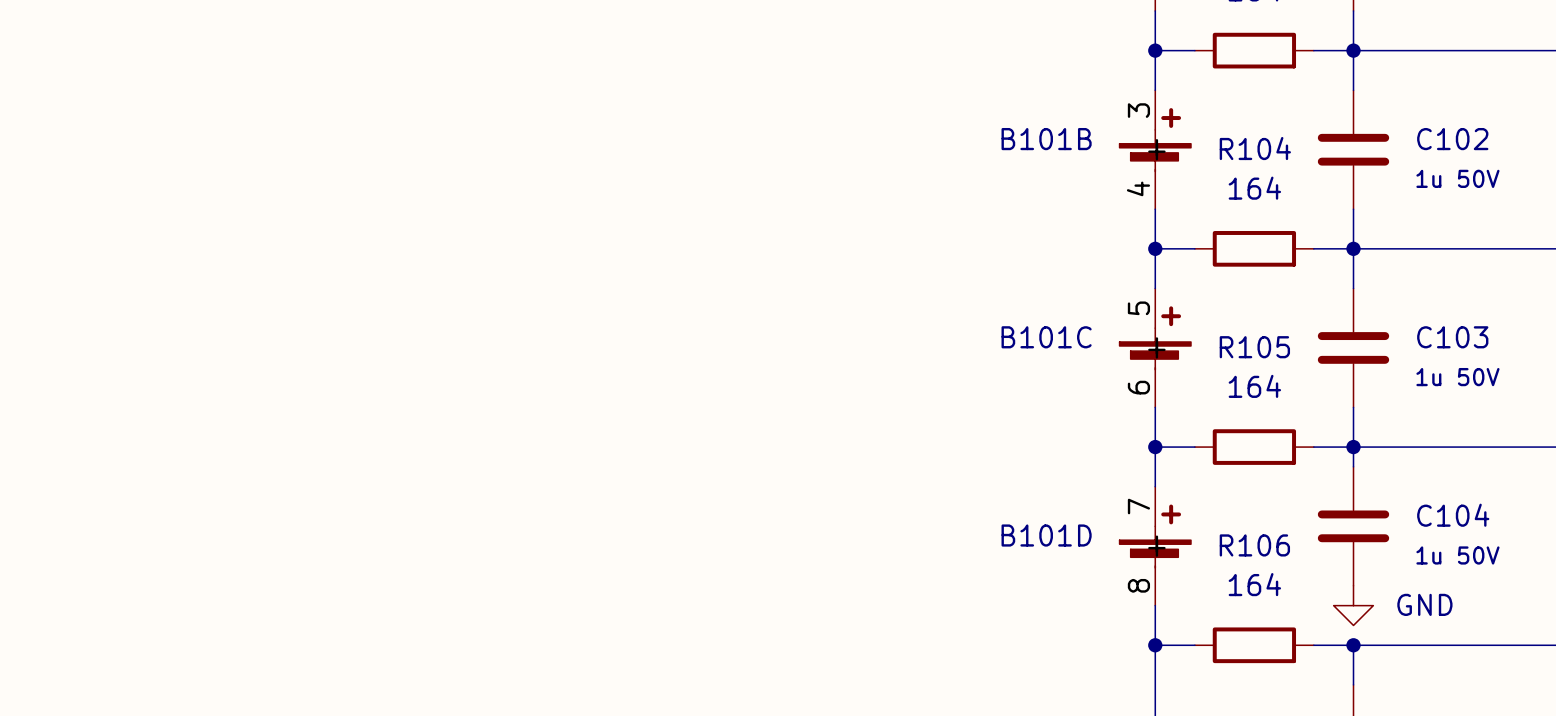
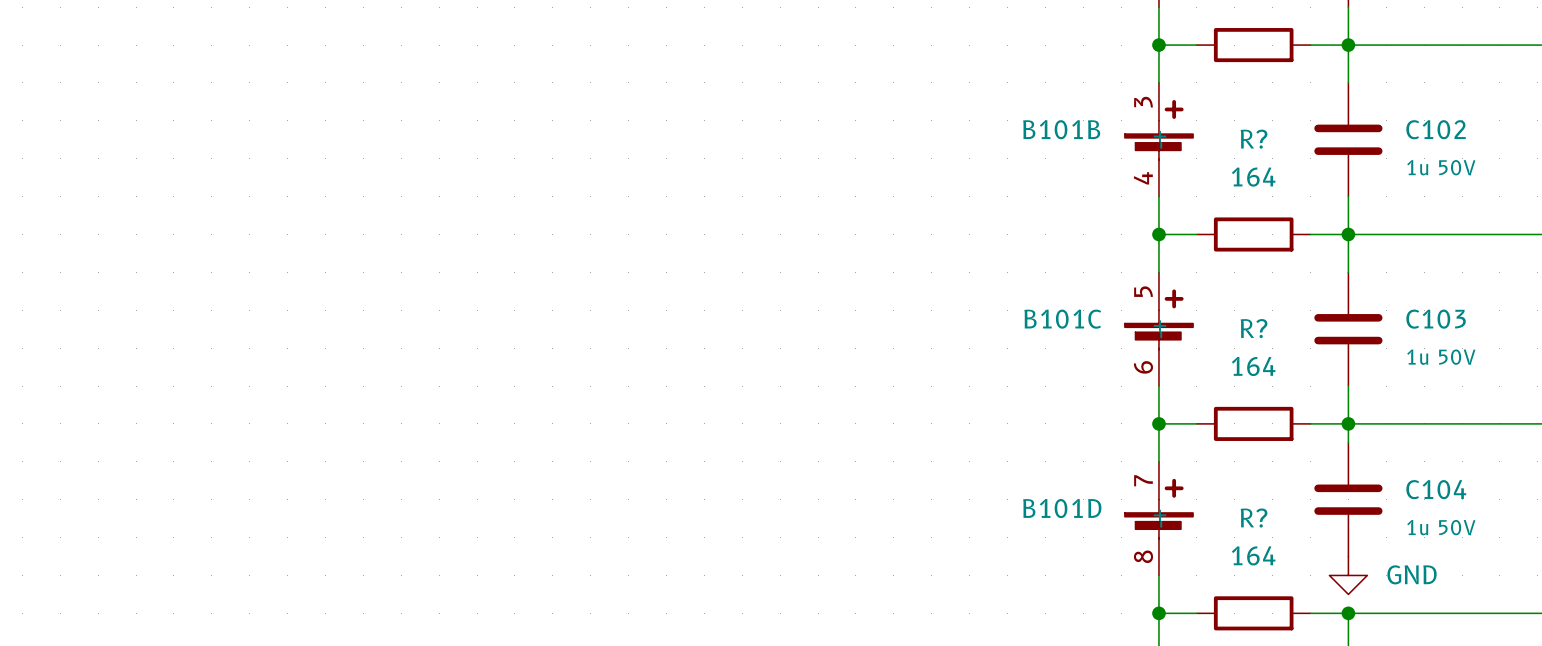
R104 name: R104 (1255, 148) -> R? (1254, 139)
R105 name: R105 (1254, 347) -> R? (1254, 328)
R106 name: R106 (1254, 545) -> R? (1254, 518)

